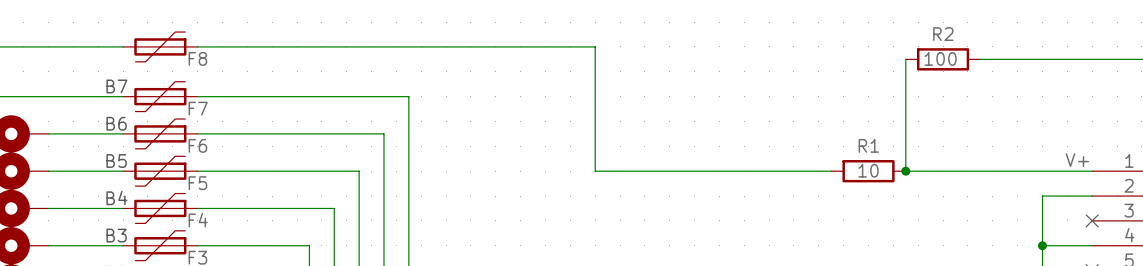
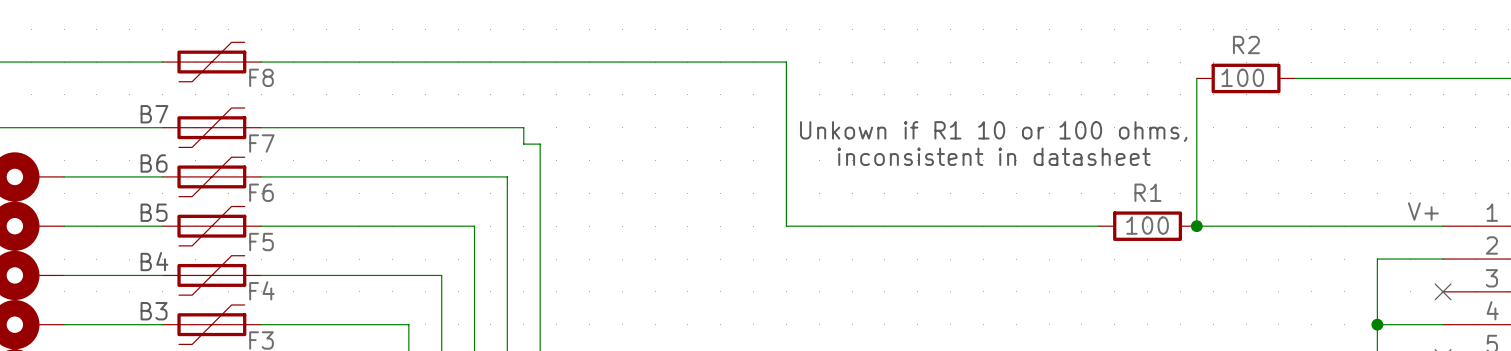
wire: (396, 96) (408, 96) (408, 109) -> (523, 127) (523, 144) (540, 144)
text: none -> Unkown if R1 10 or 100 ohms, (993, 131)
text: none -> inconsistent in datasheet (994, 156)
R1 value: 10 (868, 170) -> 100 (1147, 225)

